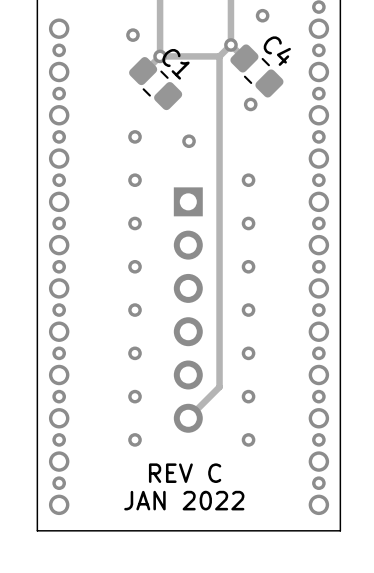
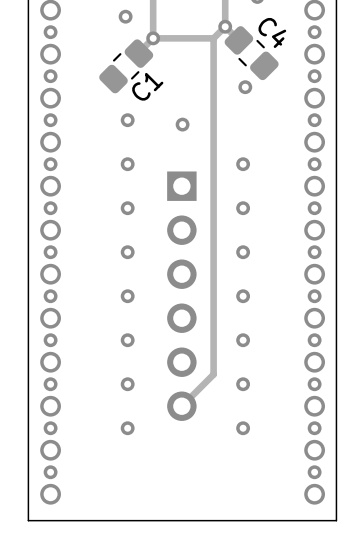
C1 rotation: 0° (155, 83) -> 90° clockwise (126, 66)
text: REV C (185, 473) -> none
text: JAN 2022 (184, 500) -> none

